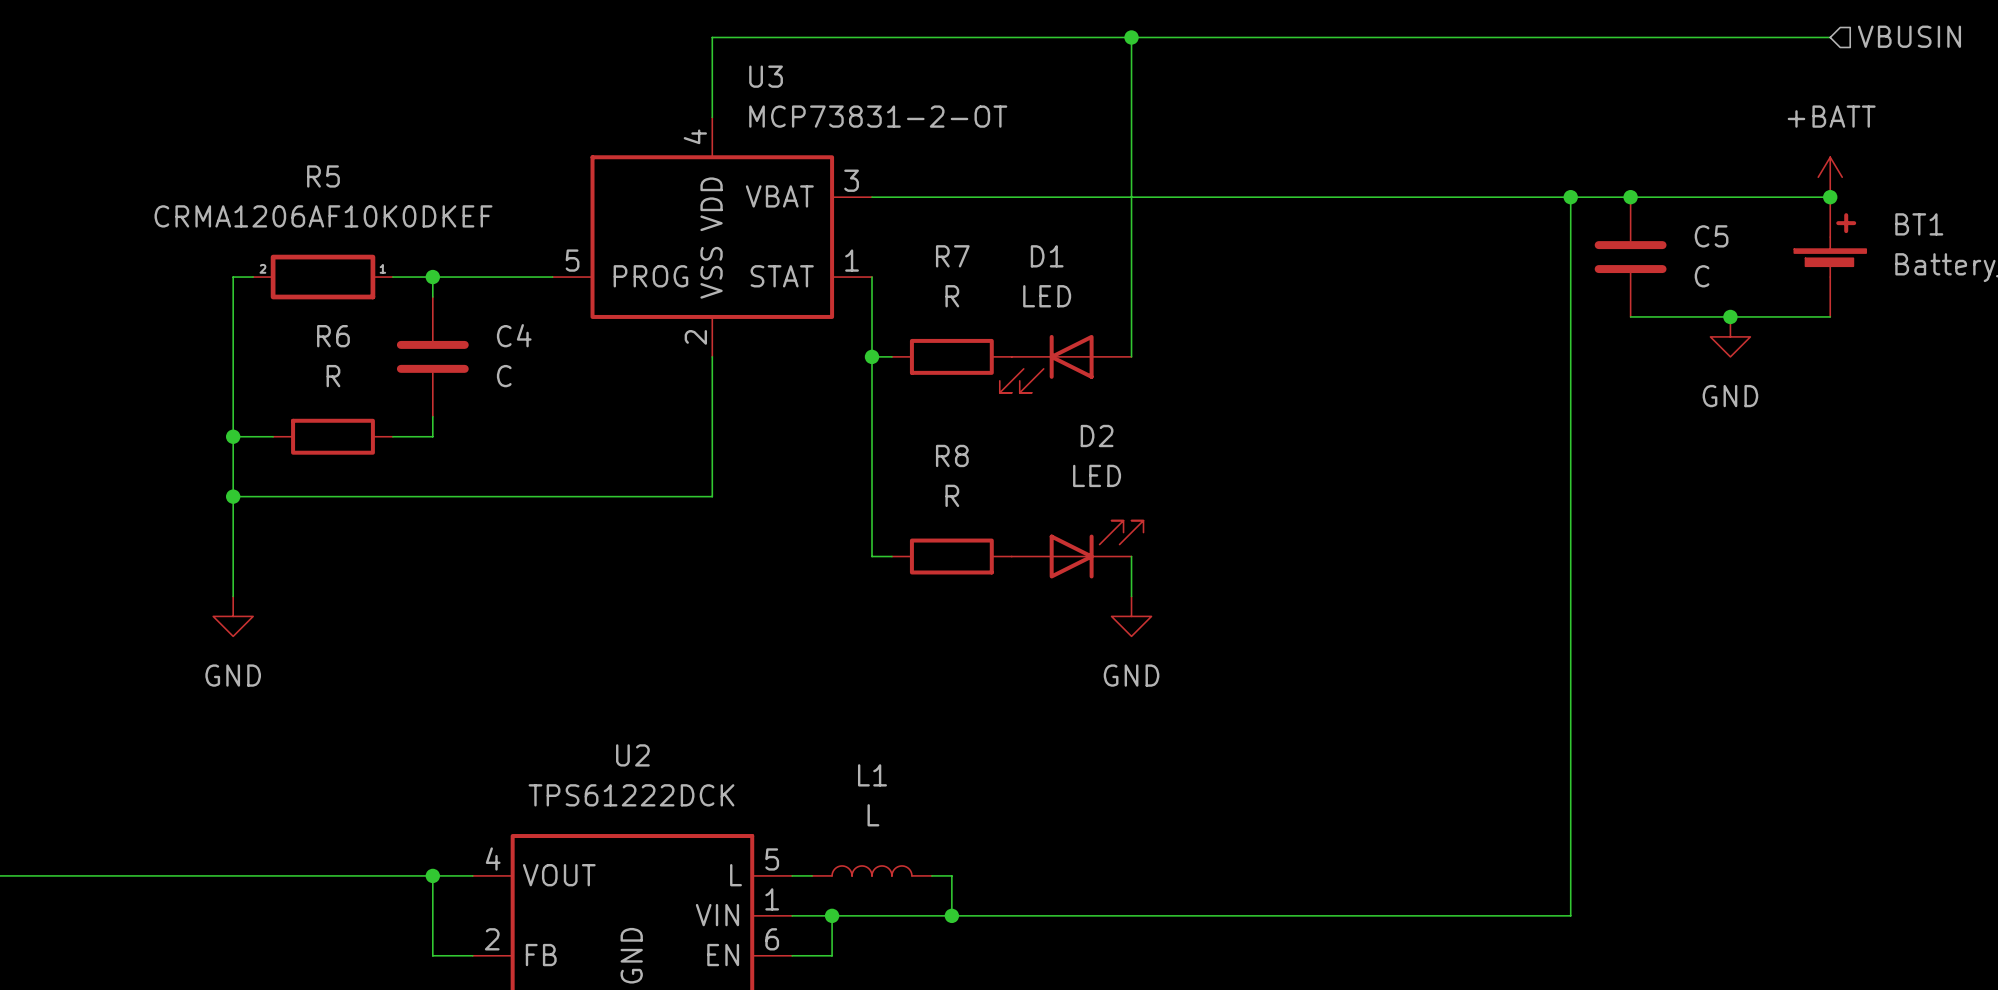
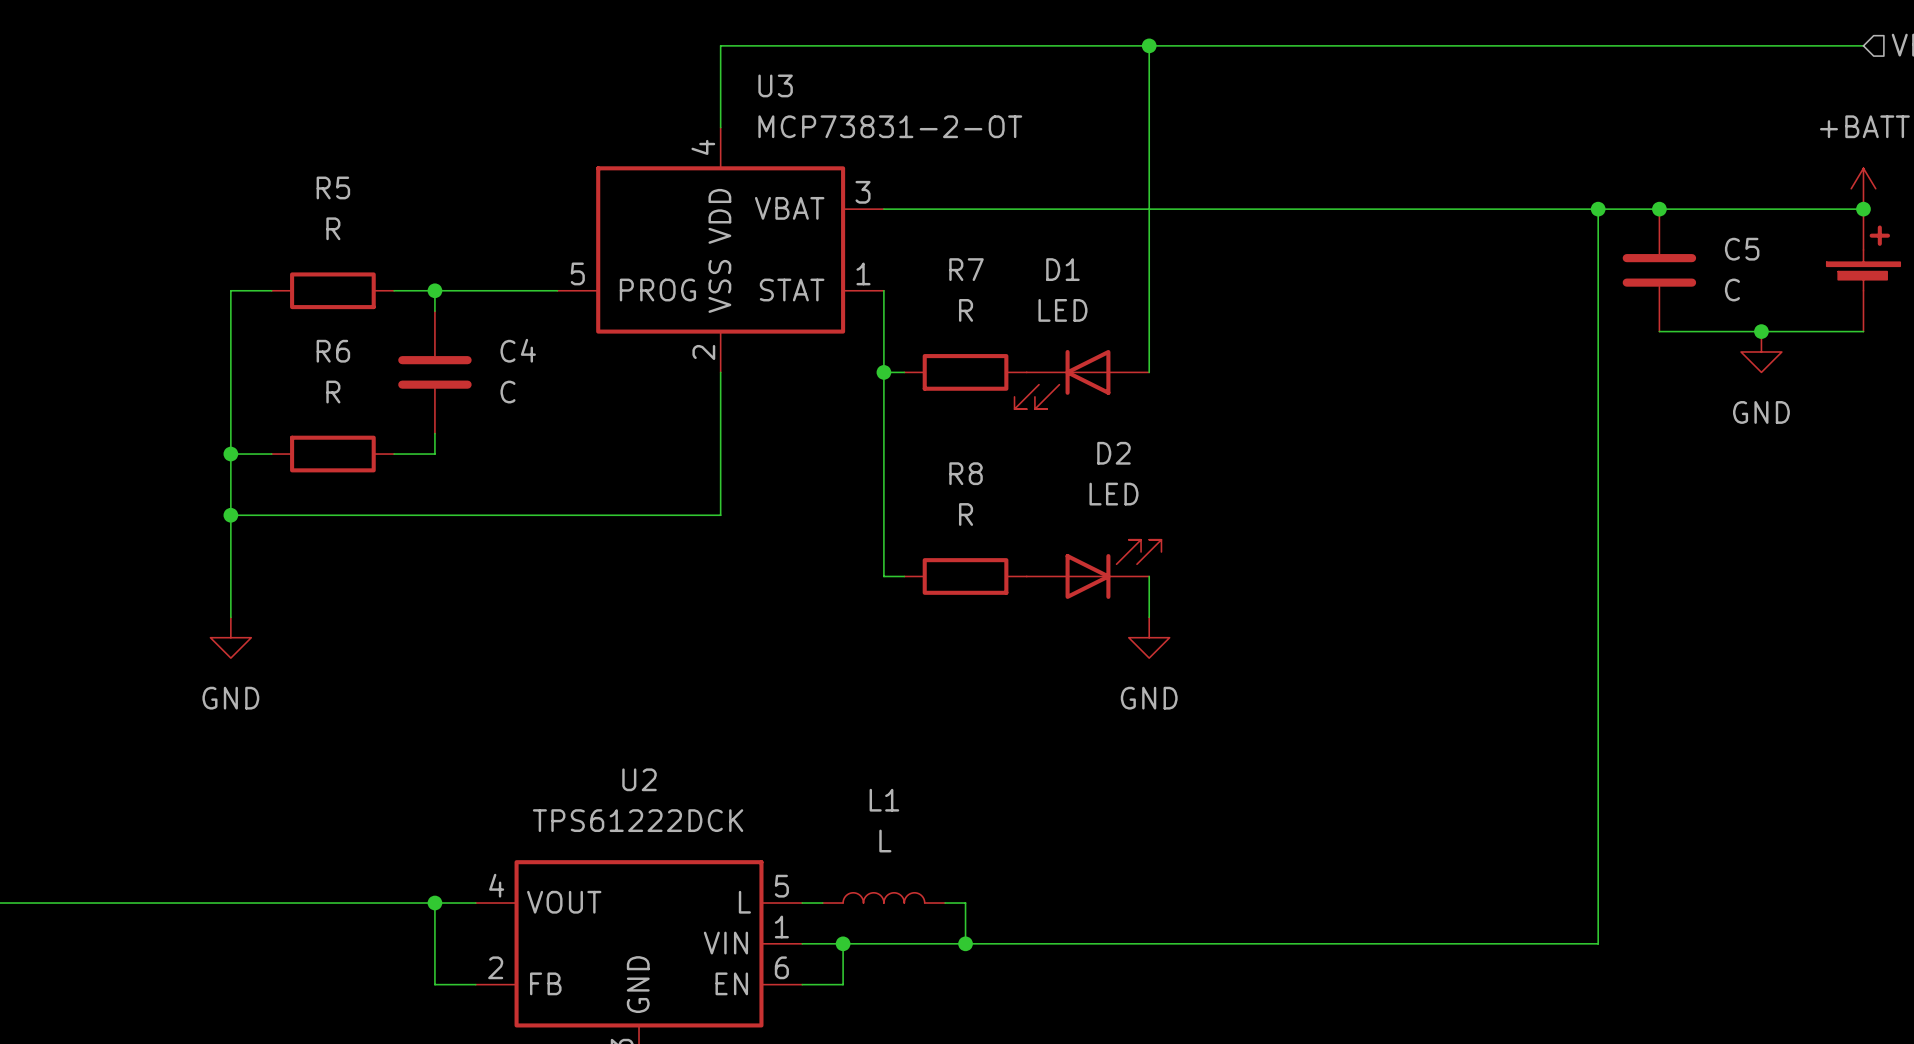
R5 value: CRMA1206AF10K0DKEF (323, 216) -> R (333, 228)
R5 symbol: [253, 254, 393, 300] -> [271, 272, 395, 310]

